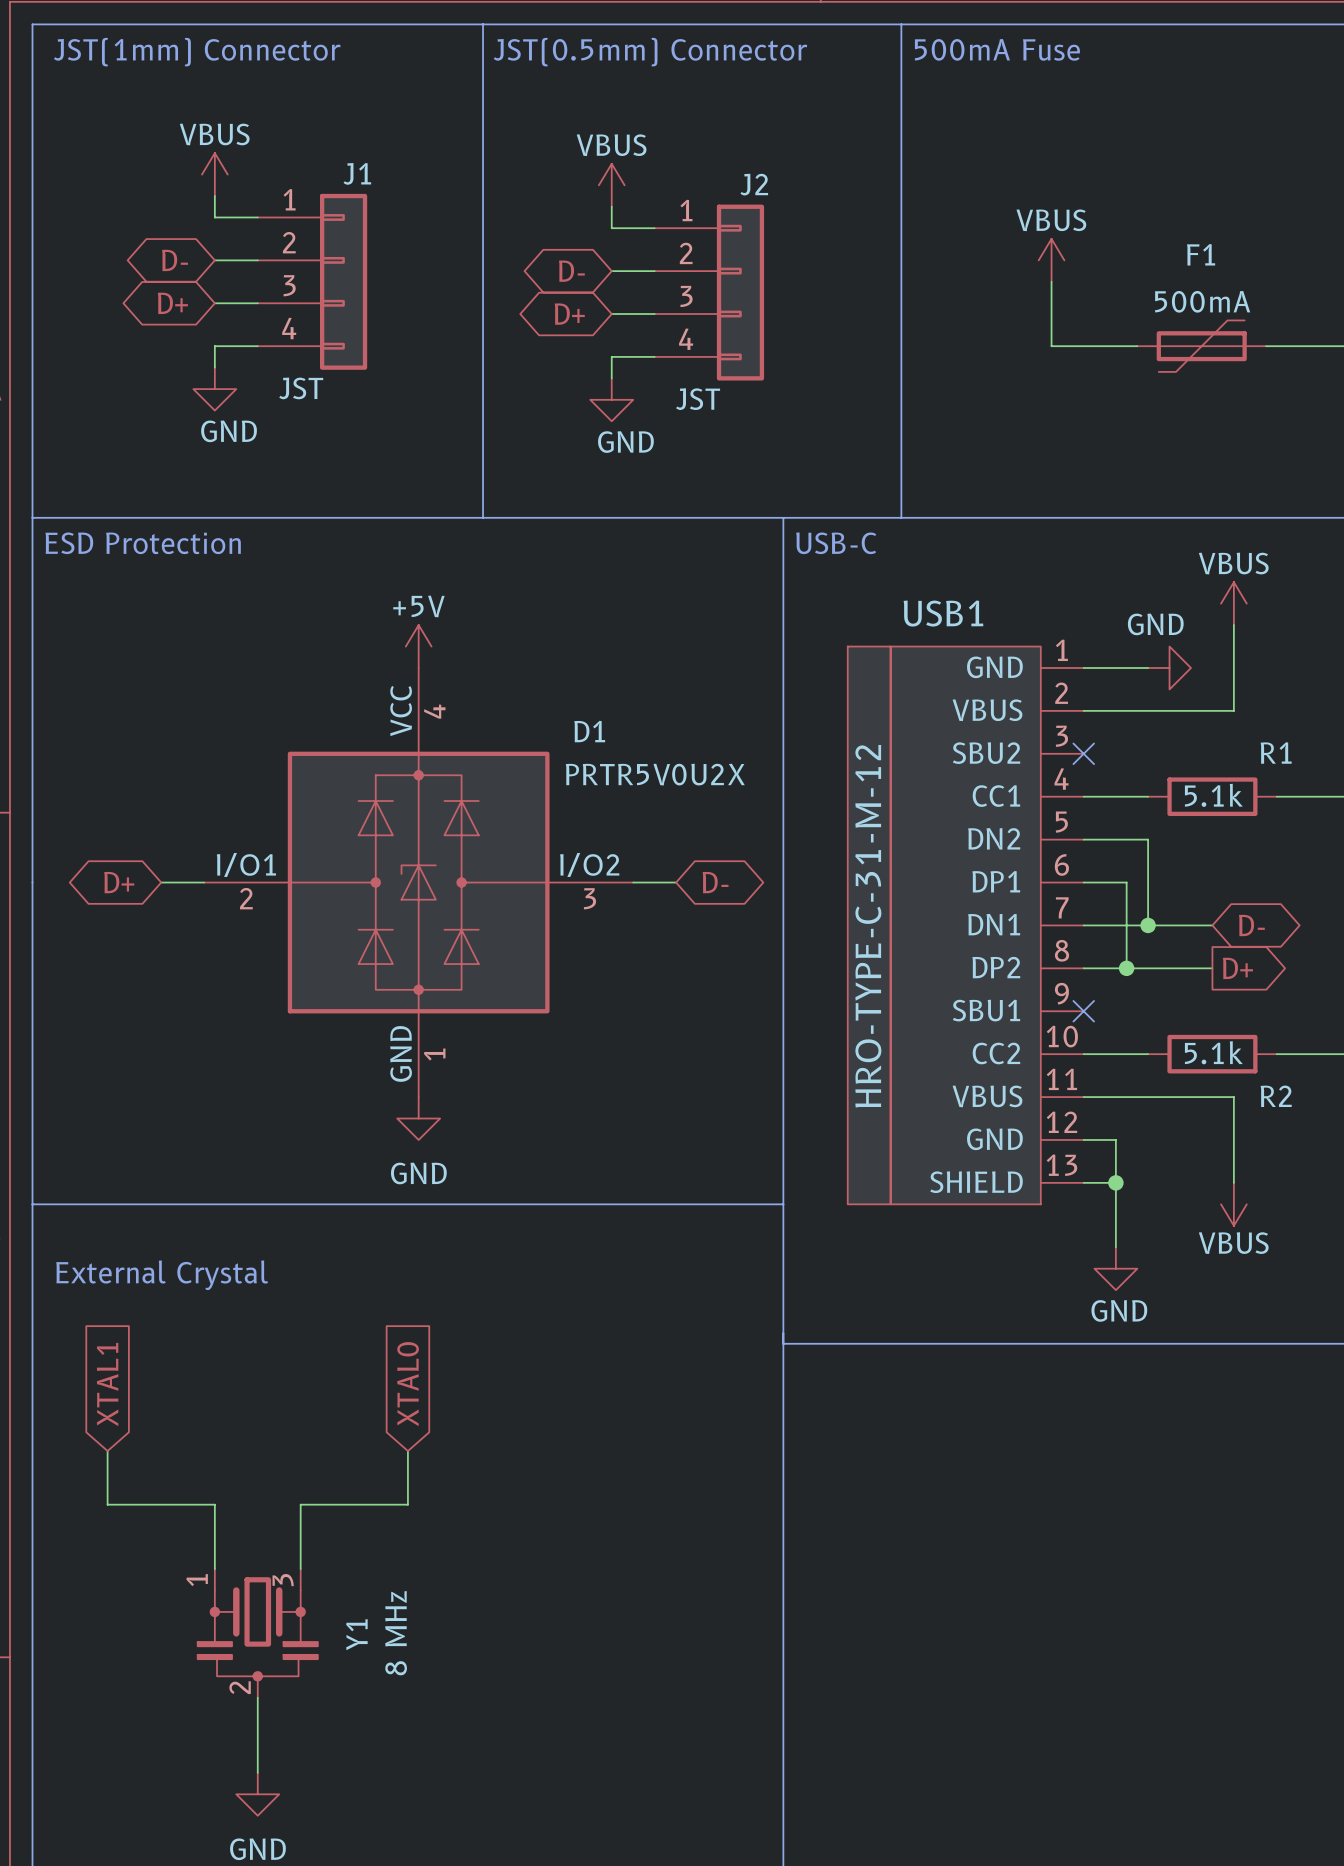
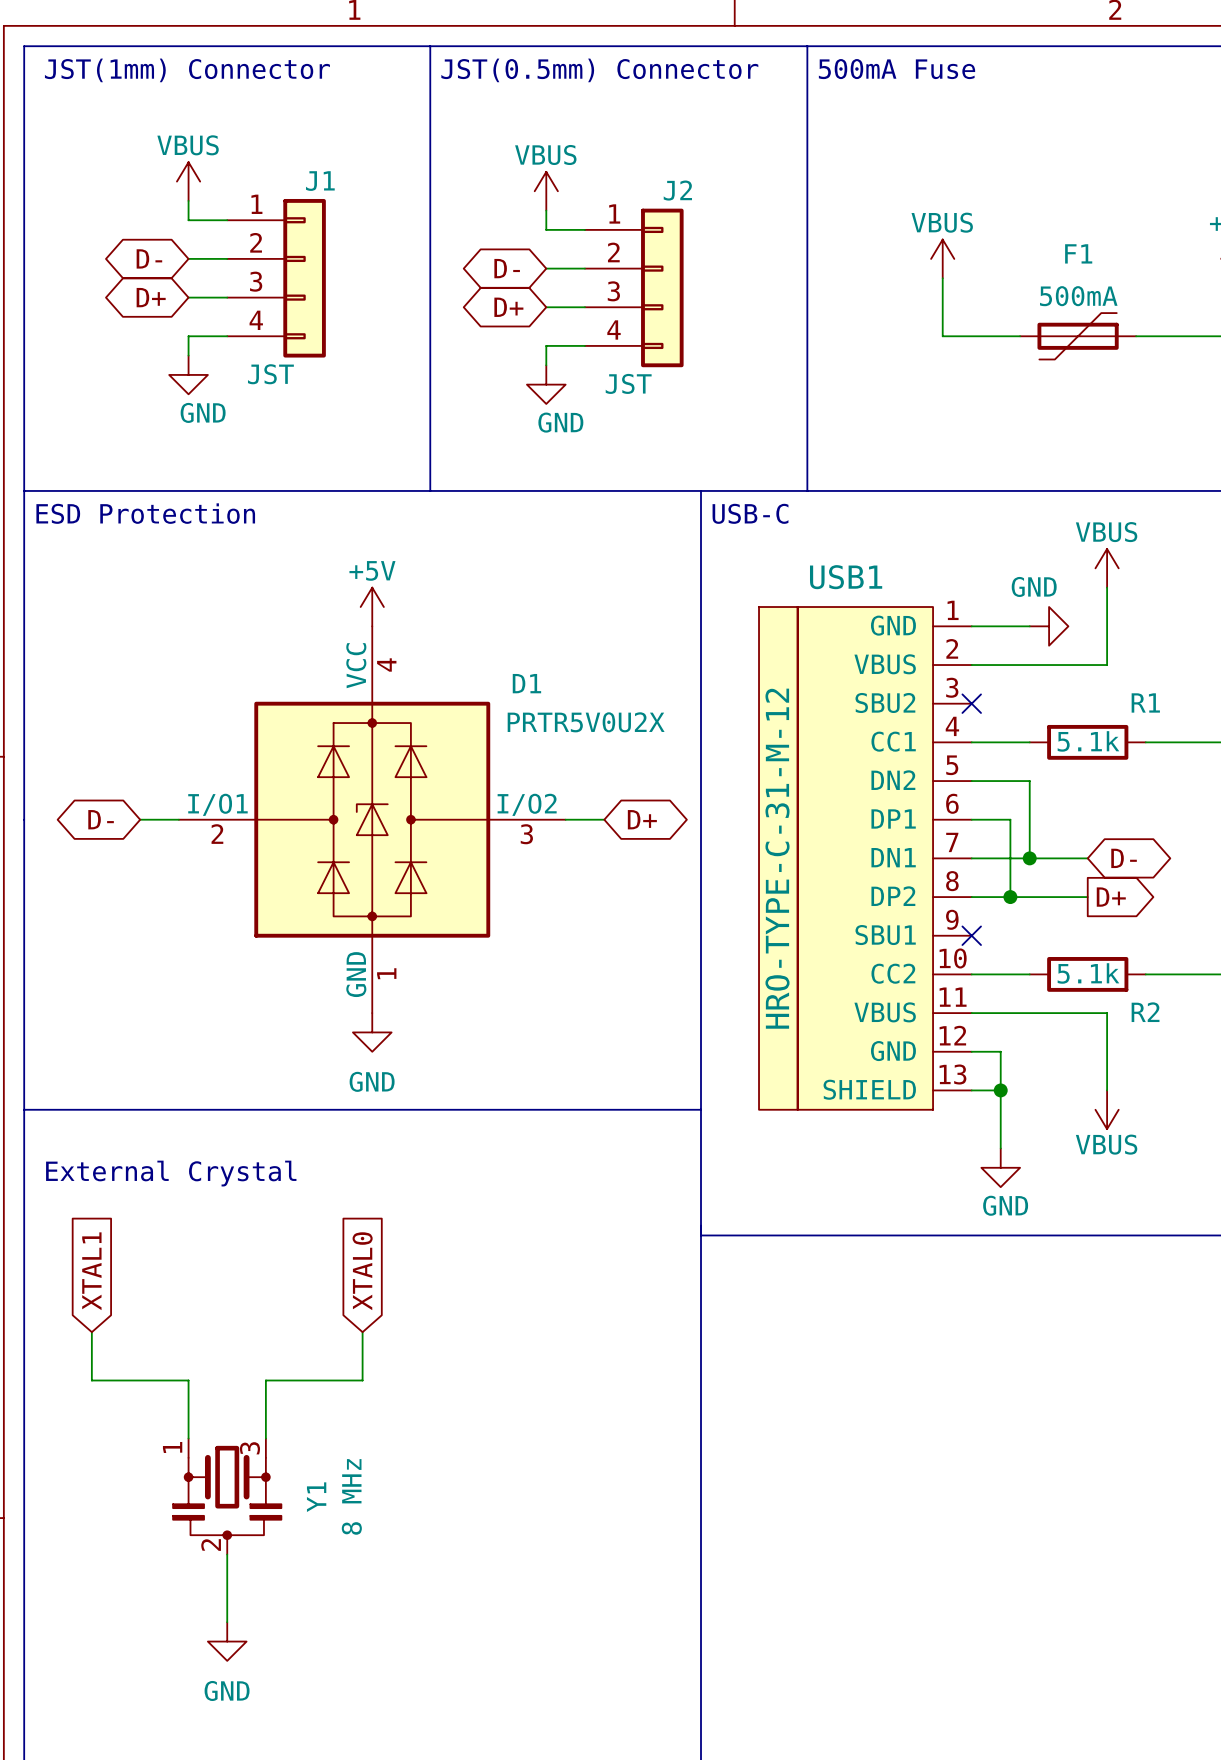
global label: D+ (119, 882) -> D- (101, 819)
global label: D- (715, 882) -> D+ (642, 819)

